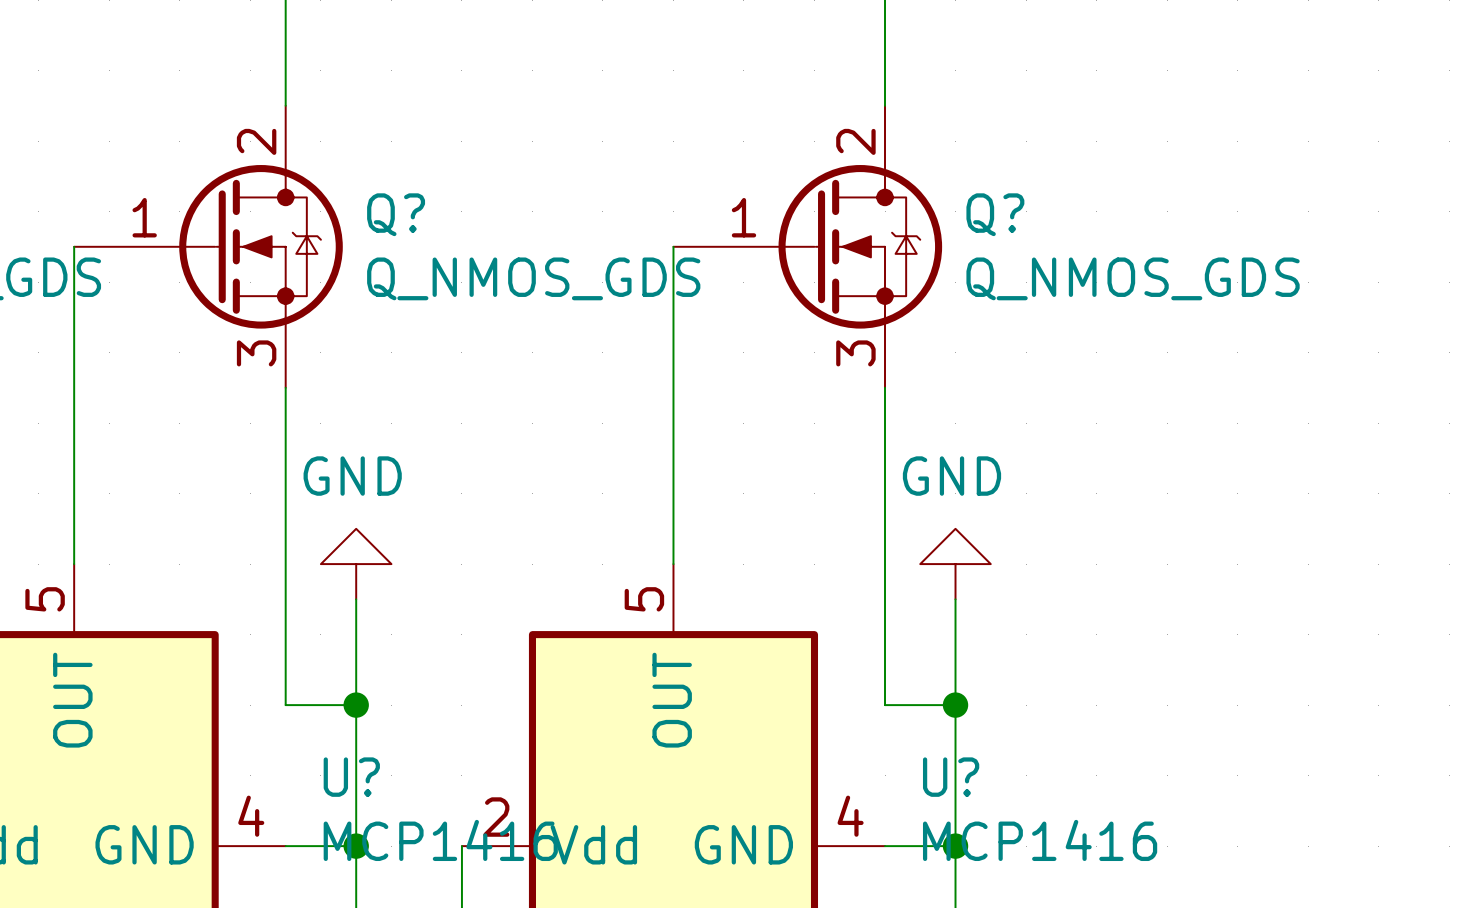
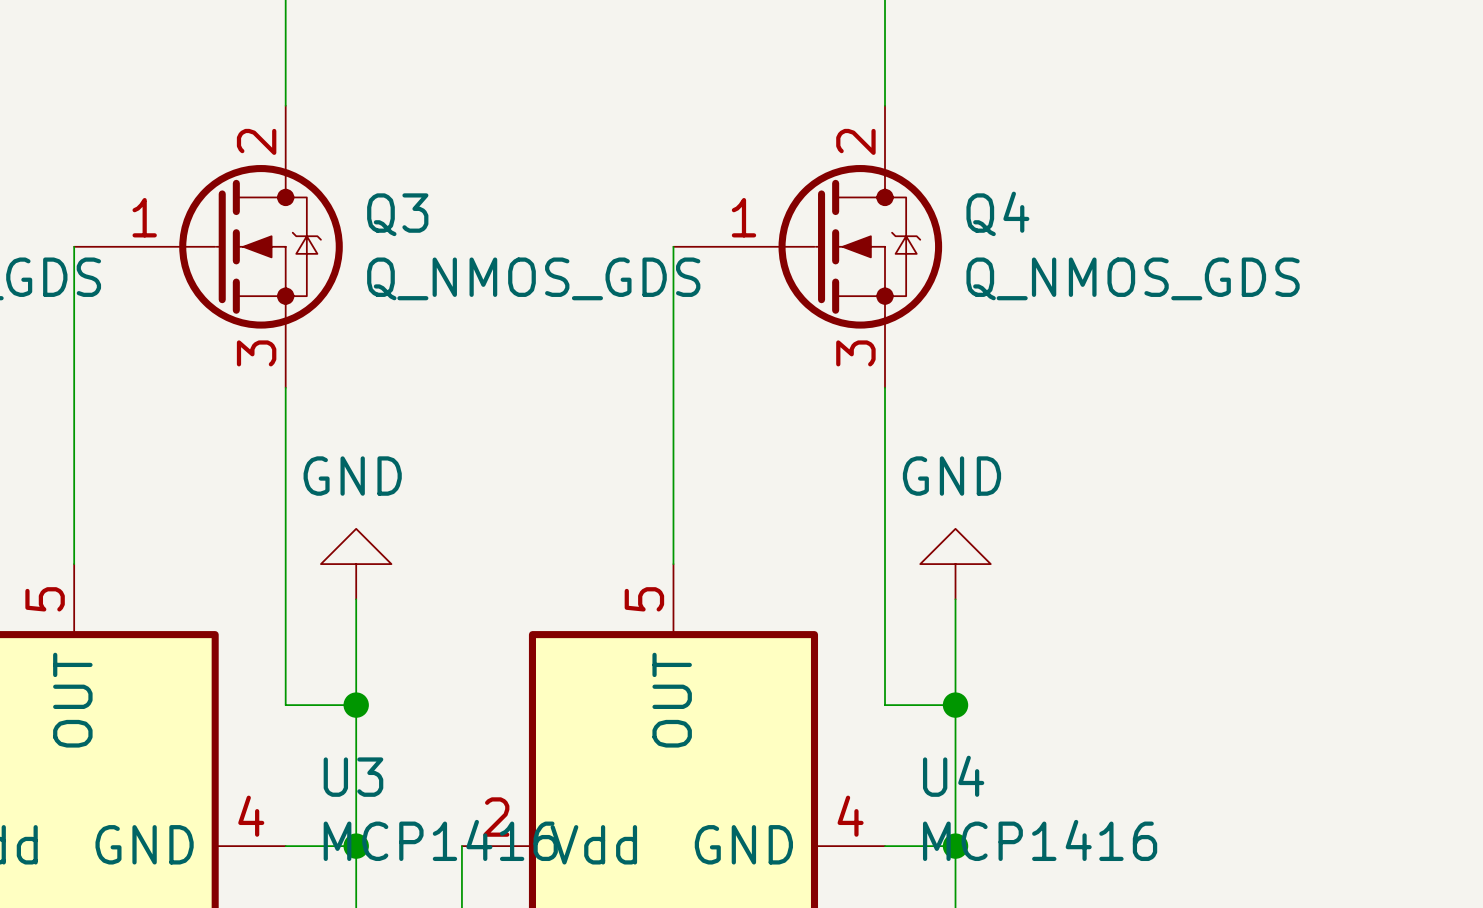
Q? name: Q? (396, 214) -> Q3 (397, 214)
Q? name: Q? (995, 214) -> Q4 (997, 213)
U? name: U? (351, 777) -> U3 (353, 777)
U? name: U? (951, 777) -> U4 (953, 776)

